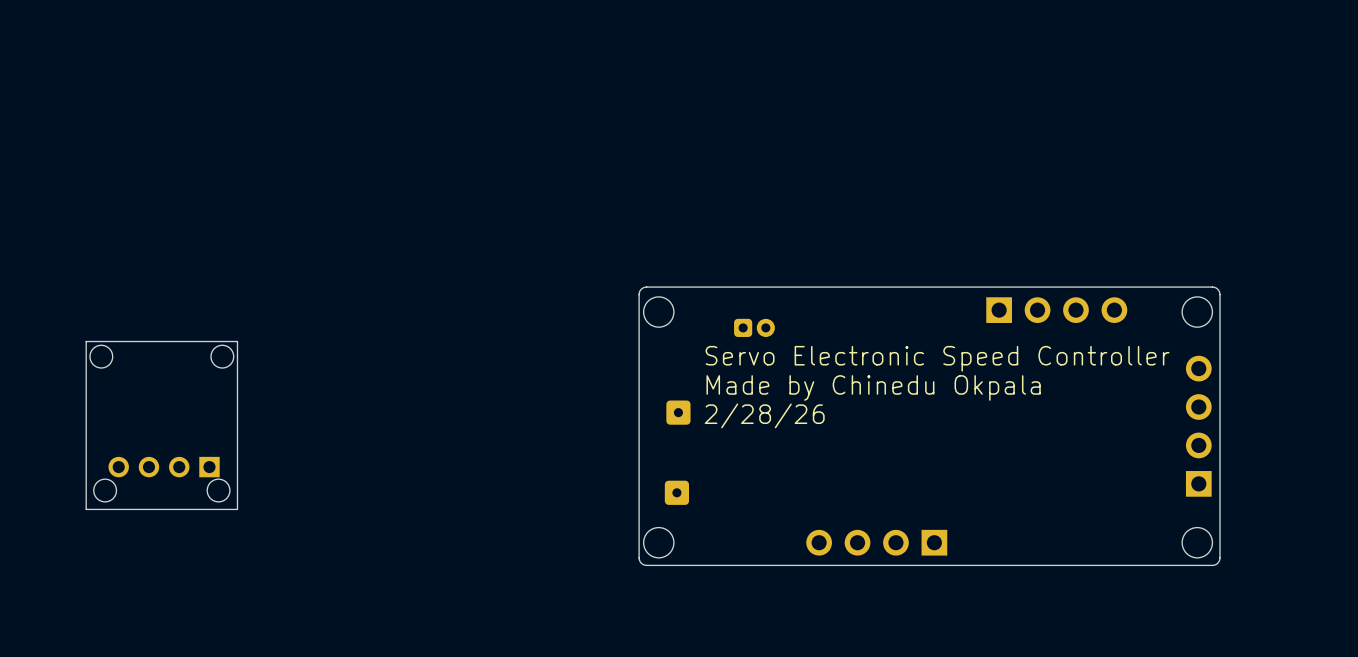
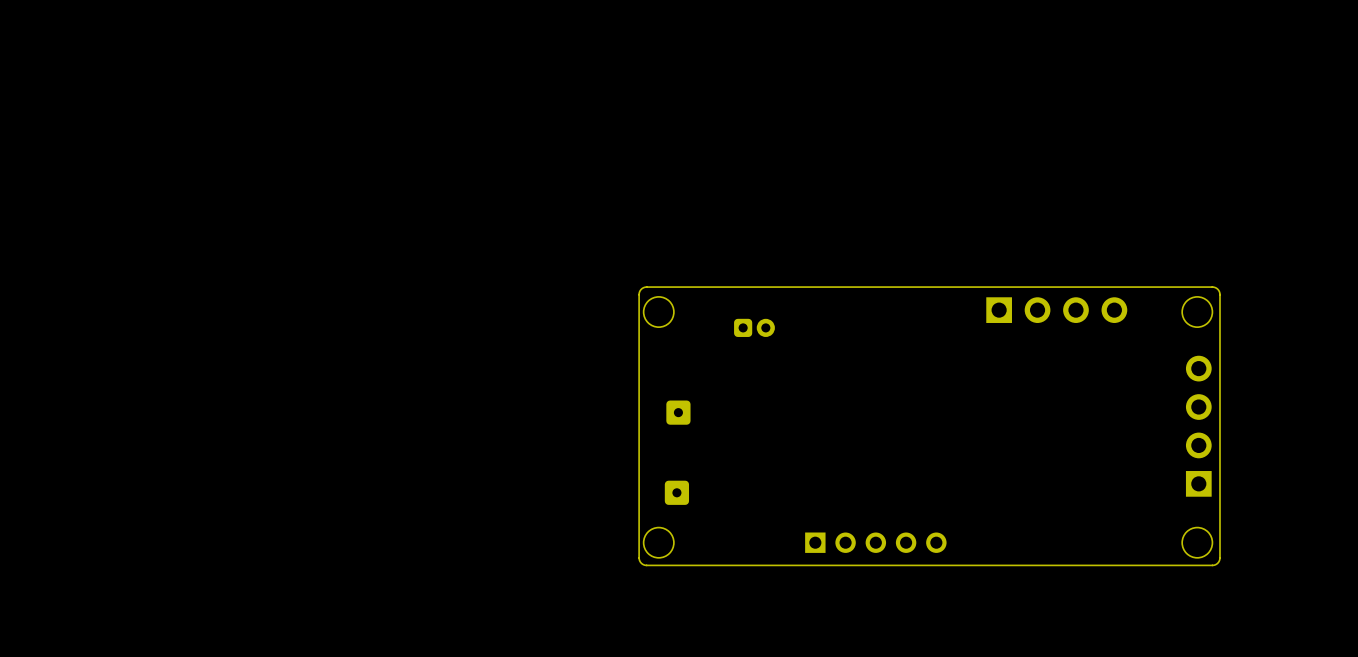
board edge: (237, 341) (86, 341) (86, 509) (237, 509) (237, 341) -> none
round board edge: [89, 344, 114, 369] -> none
round board edge: [210, 344, 235, 369] -> none
text: Servo Electronic Speed Controller (937, 358) -> none
text: Made by Chinedu Okpala (873, 387) -> none
text: 2/28/26 (764, 415) -> none
part: (164, 467) -> none
round board edge: [93, 478, 117, 503] -> none
round board edge: [206, 478, 231, 503] -> none
part footprint: [806, 529, 948, 556] -> [805, 532, 947, 553]

